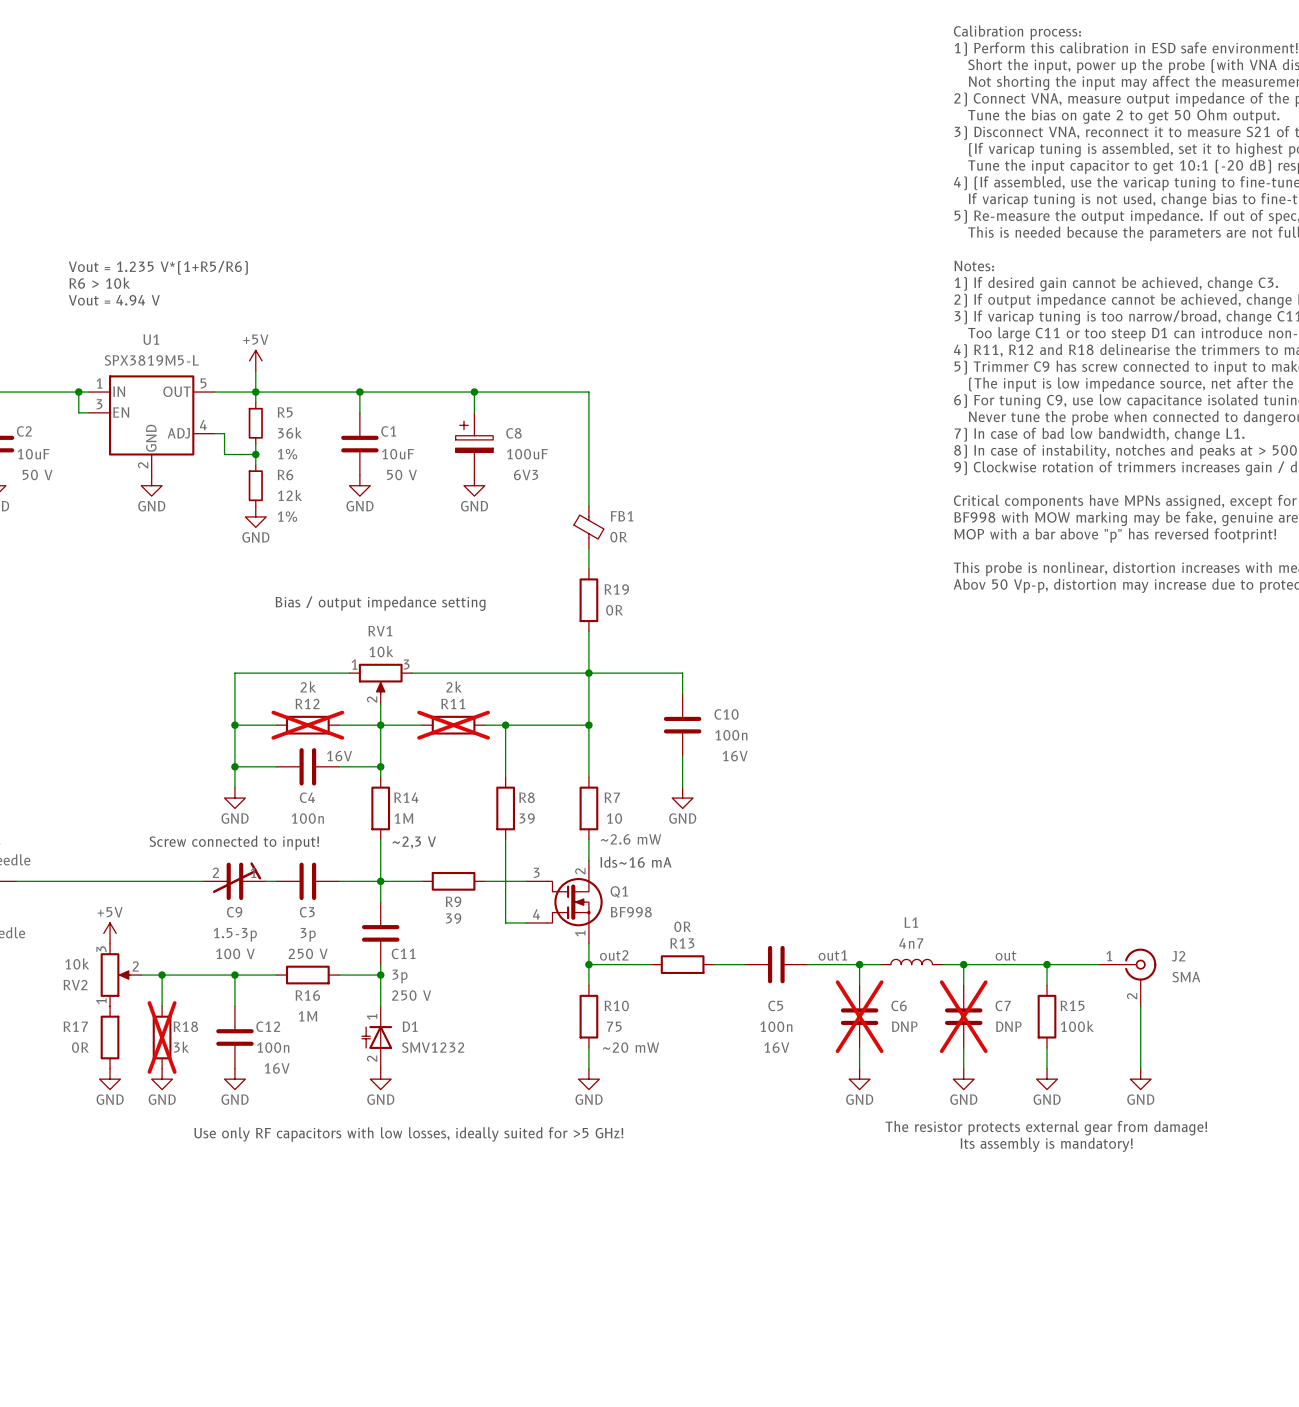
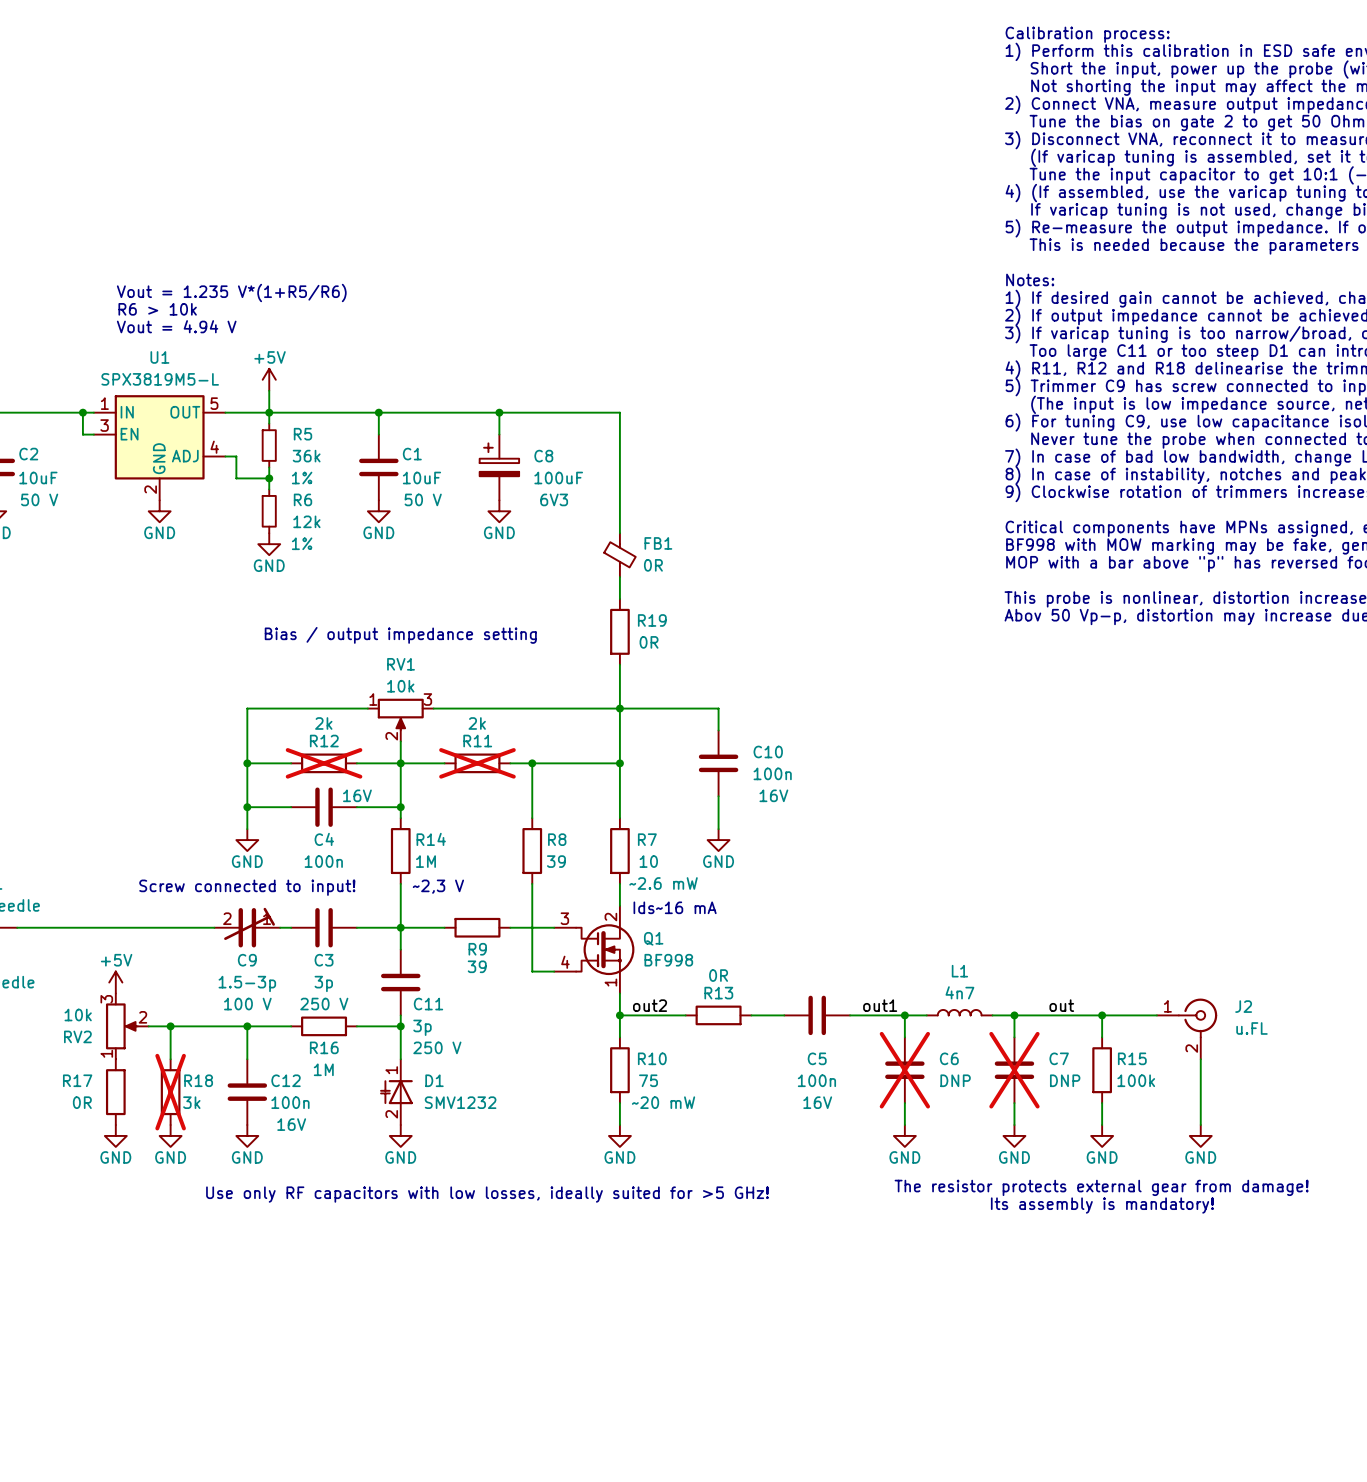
text position: Vout = 1.235 V*(1+R5/R6) (158, 267) -> Vout = 1.235 V*(1+R5/R6) (231, 292)
text position: R6 > 10k (99, 283) -> R6 > 10k (157, 309)
text position: Vout = 4.94 V (114, 300) -> Vout = 4.94 V (176, 326)
J2 value: SMA (1186, 977) -> u.FL (1251, 1028)

